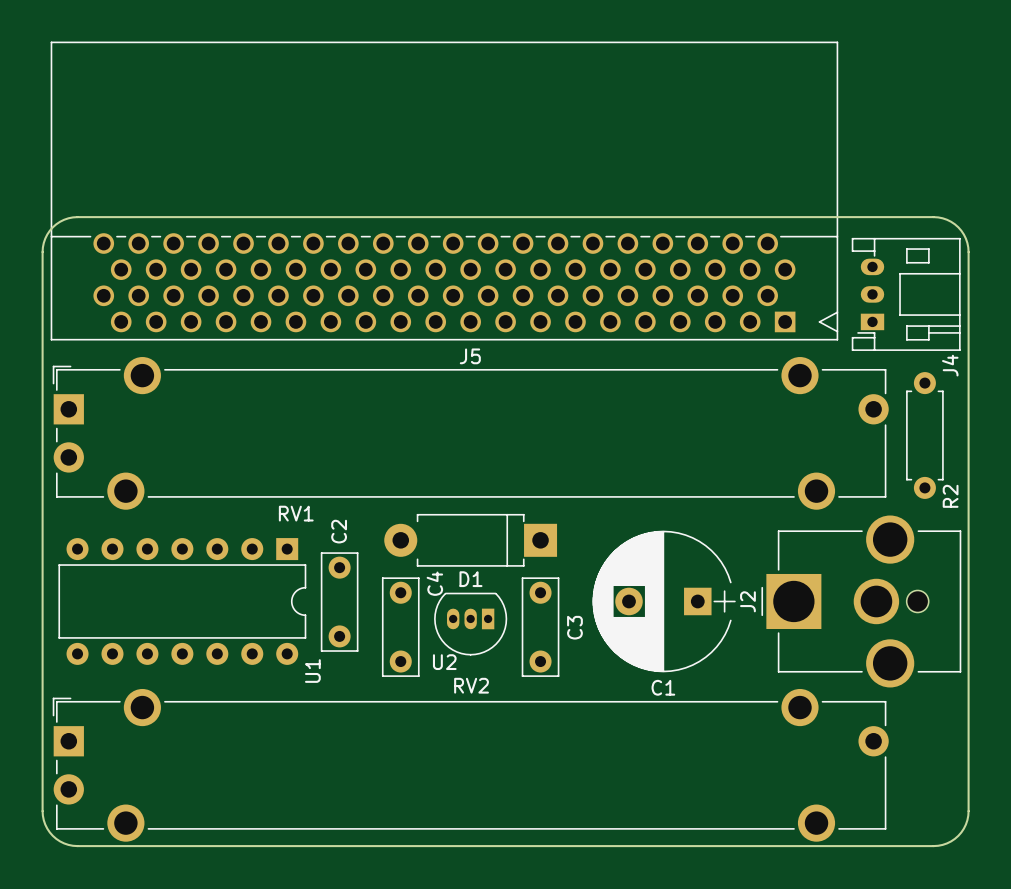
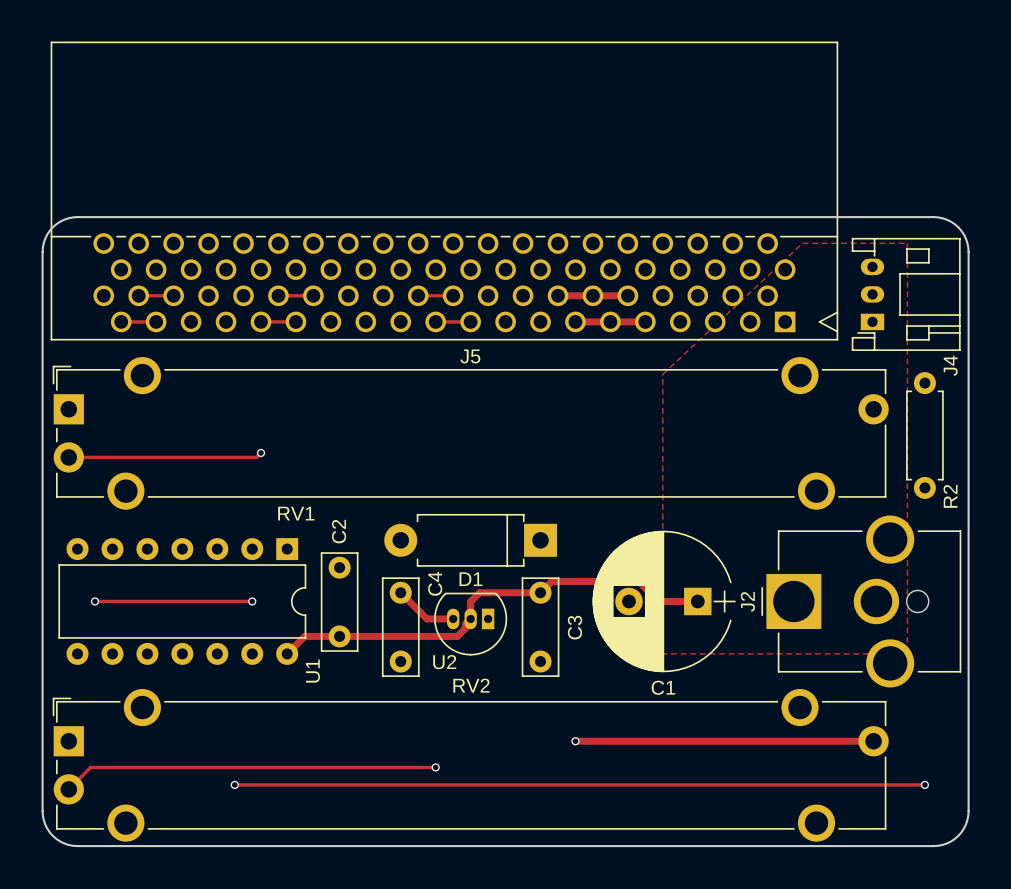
zone outline: none -> (802, 243) (662, 374) (662, 653) (907, 653) (907, 243) (802, 243)
track: none -> (138, 295) (173, 295)
track: none -> (278, 295) (313, 295)
track: none -> (418, 295) (453, 295)
track: none -> (558, 295) (627, 295)
track: none -> (121, 321) (156, 321)
track: none -> (260, 321) (295, 321)
track: none -> (435, 321) (470, 321)
track: none -> (575, 321) (645, 321)
track: none -> (260, 452) (256, 457) (68, 457)
via: none -> (260, 452)
track: none -> (400, 592) (426, 618) (453, 618)
track: none -> (95, 601) (252, 601)
via: none -> (95, 601)
via: none -> (252, 601)
track: none -> (697, 601) (658, 601) (638, 581) (551, 581) (540, 592) (479, 592) (470, 601) (470, 618) (465, 623) (465, 628) (457, 636) (304, 636) (287, 653)
track: none -> (575, 741) (873, 741)
via: none -> (575, 741)
track: none -> (435, 767) (90, 767) (68, 789)
via: none -> (435, 767)
track: none -> (234, 784) (924, 784)
via: none -> (234, 784)
via: none -> (924, 784)

